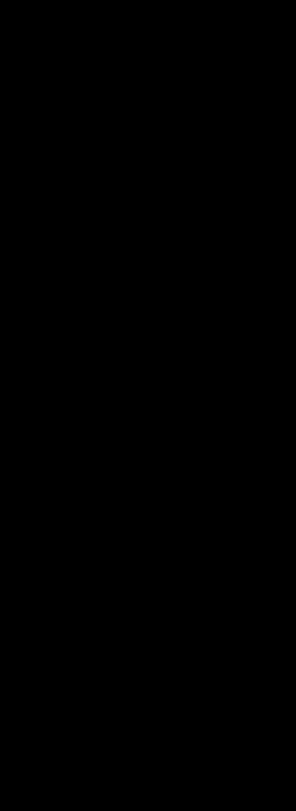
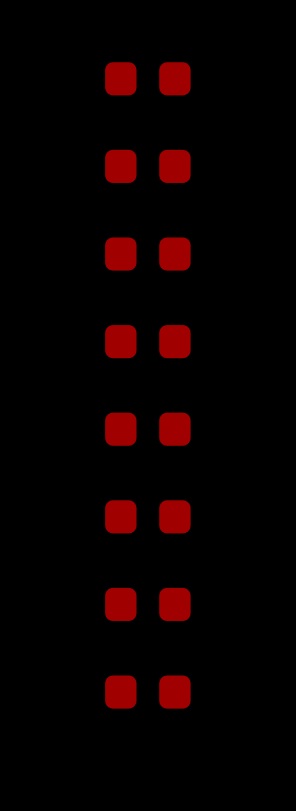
part: none -> (147, 78)
part: none -> (147, 166)
part: none -> (147, 254)
part: none -> (147, 341)
part: none -> (147, 429)
part: none -> (147, 516)
part: none -> (147, 604)
part: none -> (147, 692)

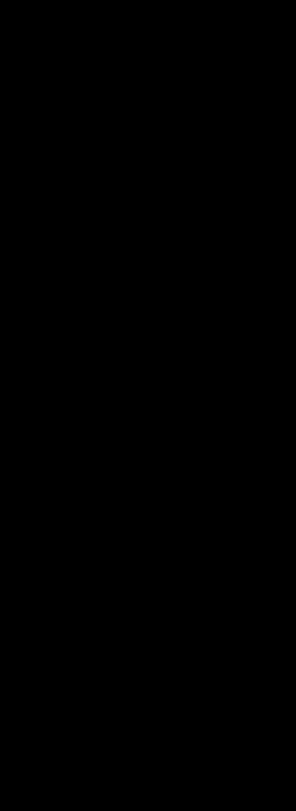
part: (147, 78) -> none
part: (147, 166) -> none
part: (147, 254) -> none
part: (147, 341) -> none
part: (147, 429) -> none
part: (147, 516) -> none
part: (147, 604) -> none
part: (147, 692) -> none

